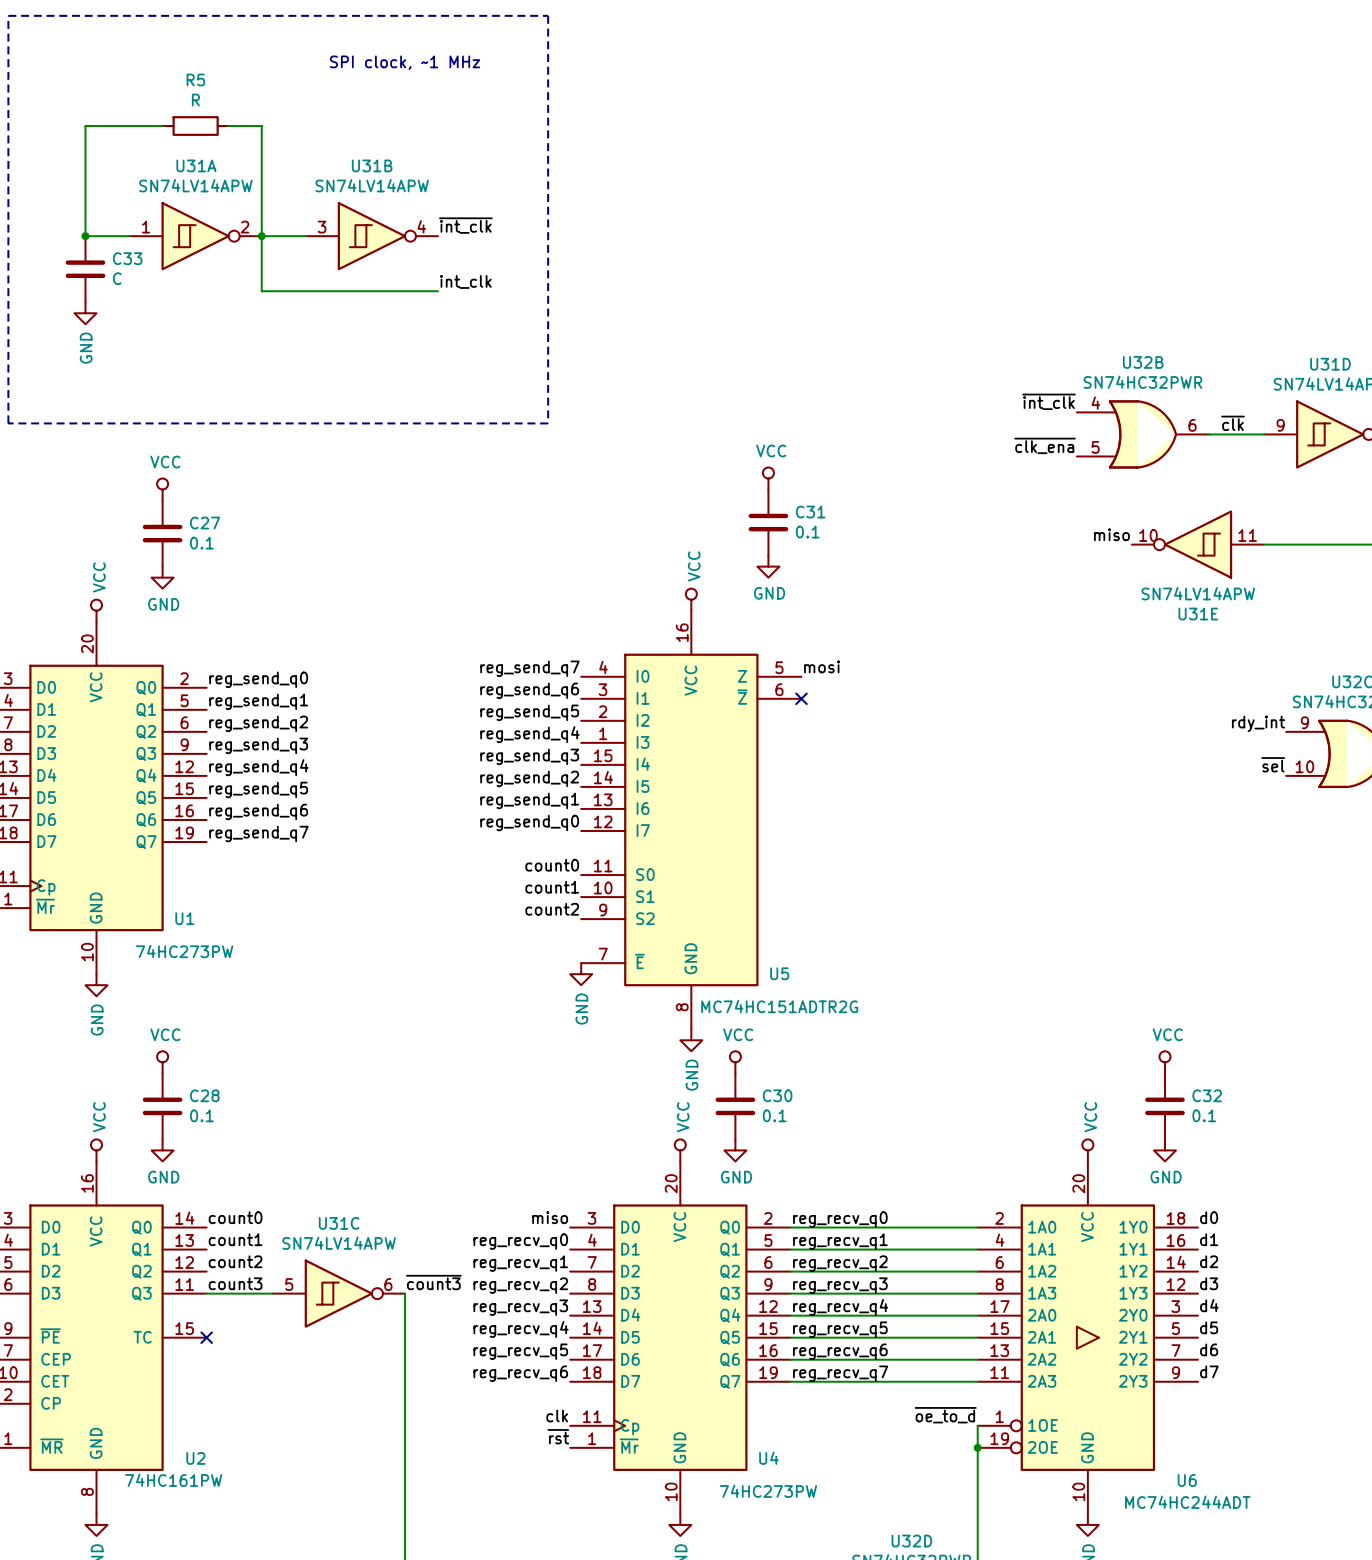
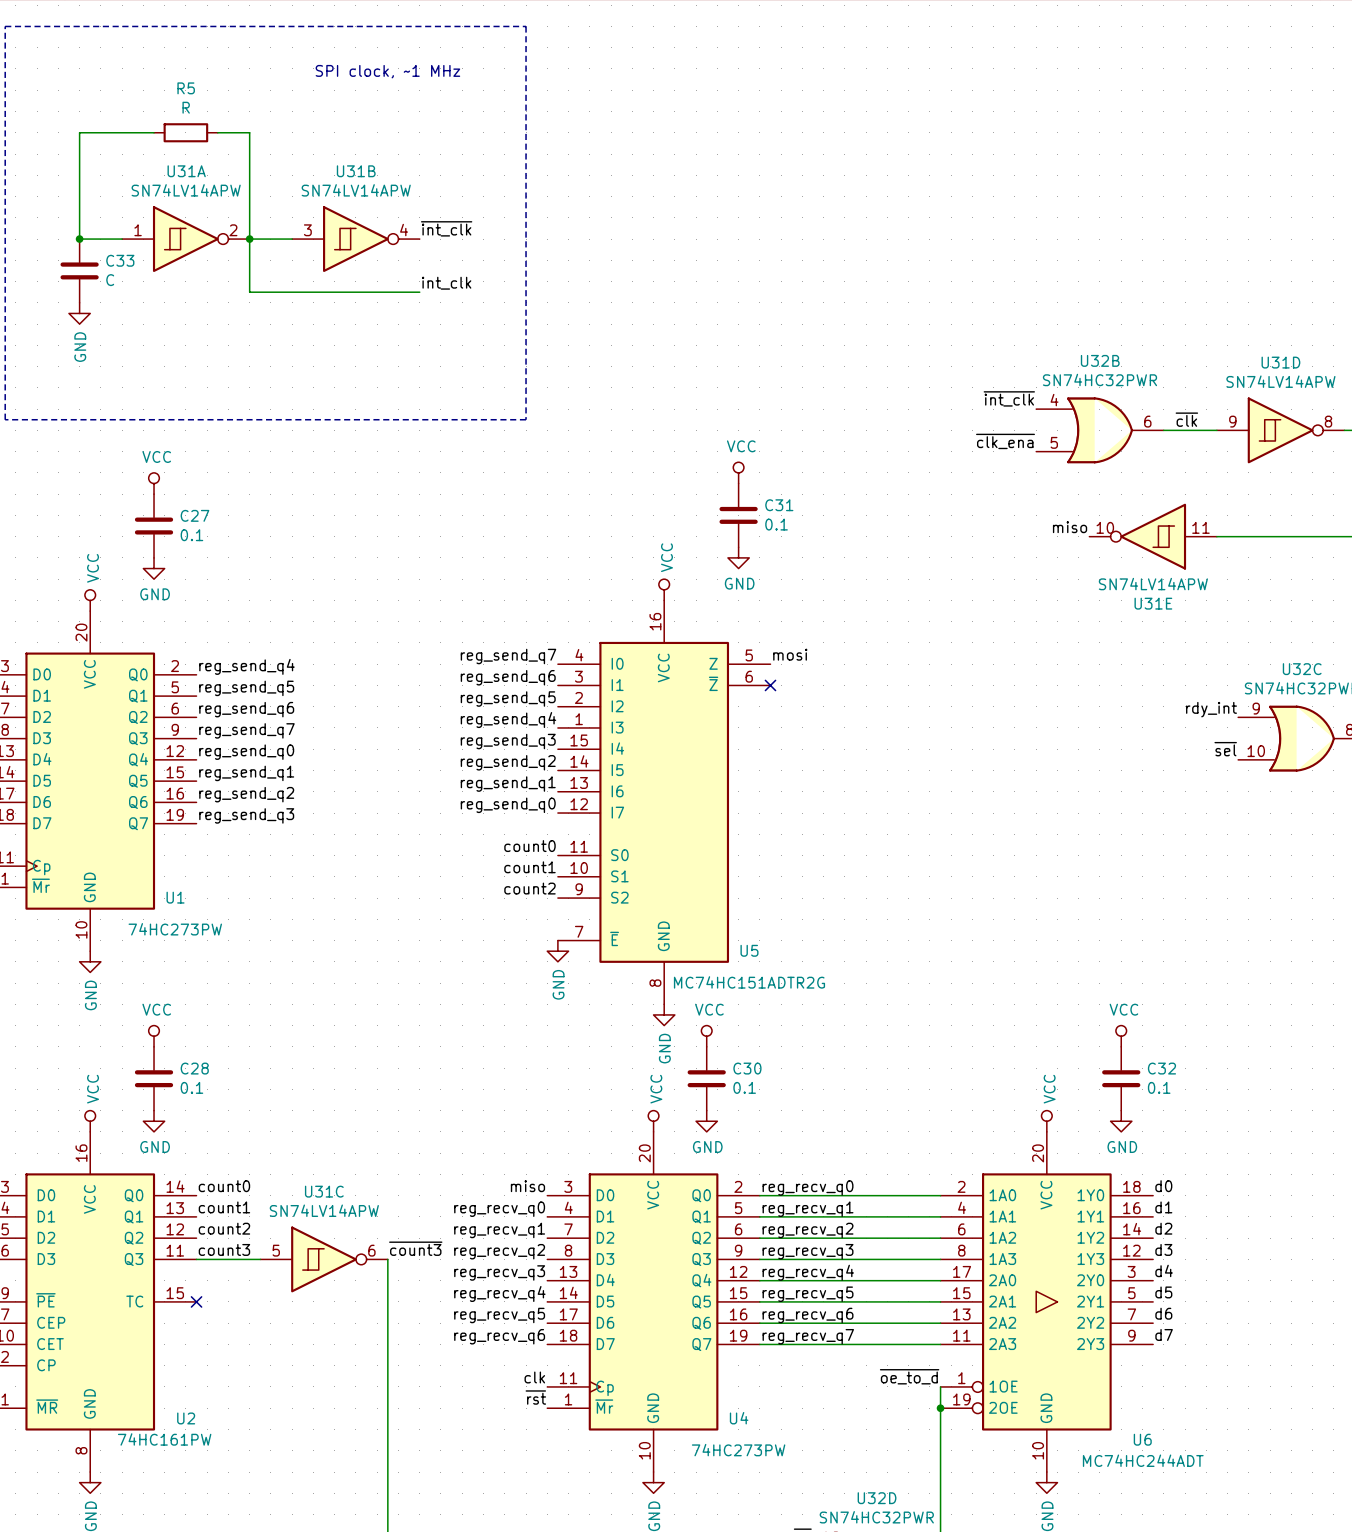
label: reg_send_q0 (258, 679) -> reg_send_q4 (246, 666)
label: reg_send_q1 (258, 701) -> reg_send_q5 (246, 688)
label: reg_send_q2 (258, 723) -> reg_send_q6 (246, 709)
label: reg_send_q3 (258, 745) -> reg_send_q7 (246, 730)
label: reg_send_q4 (258, 767) -> reg_send_q0 (246, 752)
label: reg_send_q5 (258, 789) -> reg_send_q1 (246, 773)
label: reg_send_q6 (258, 811) -> reg_send_q2 (246, 794)
label: reg_send_q7 (258, 834) -> reg_send_q3 (246, 815)

